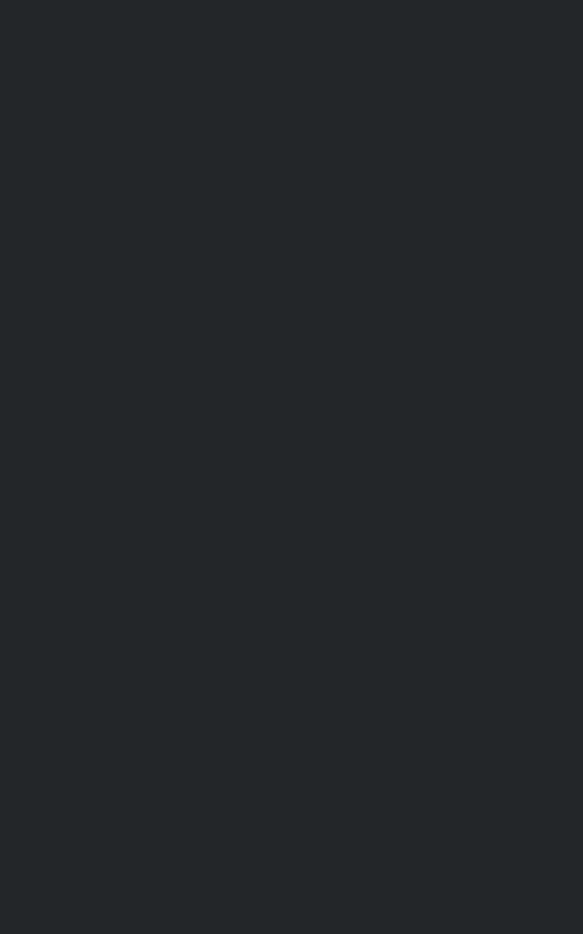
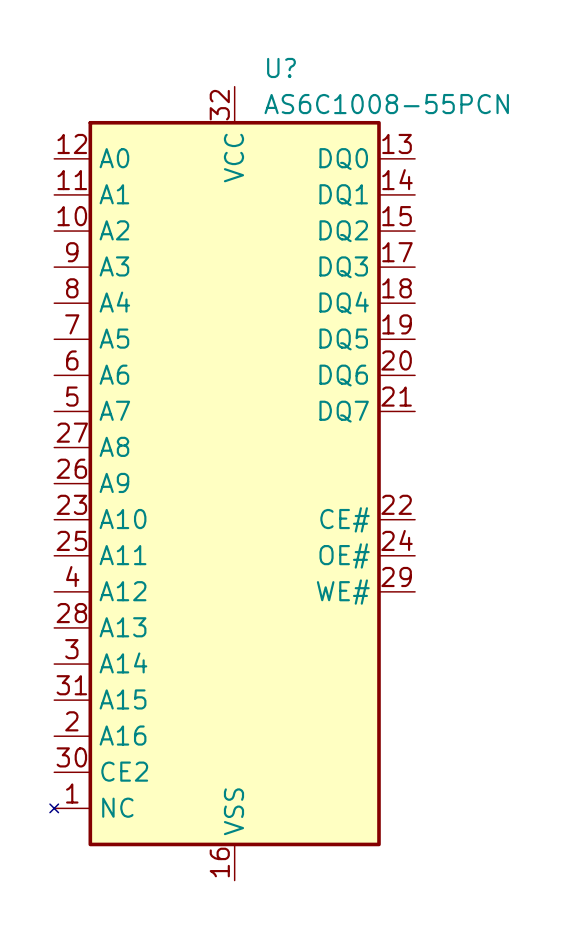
U?: none -> AS6C1008-55PCN (232, 483)

